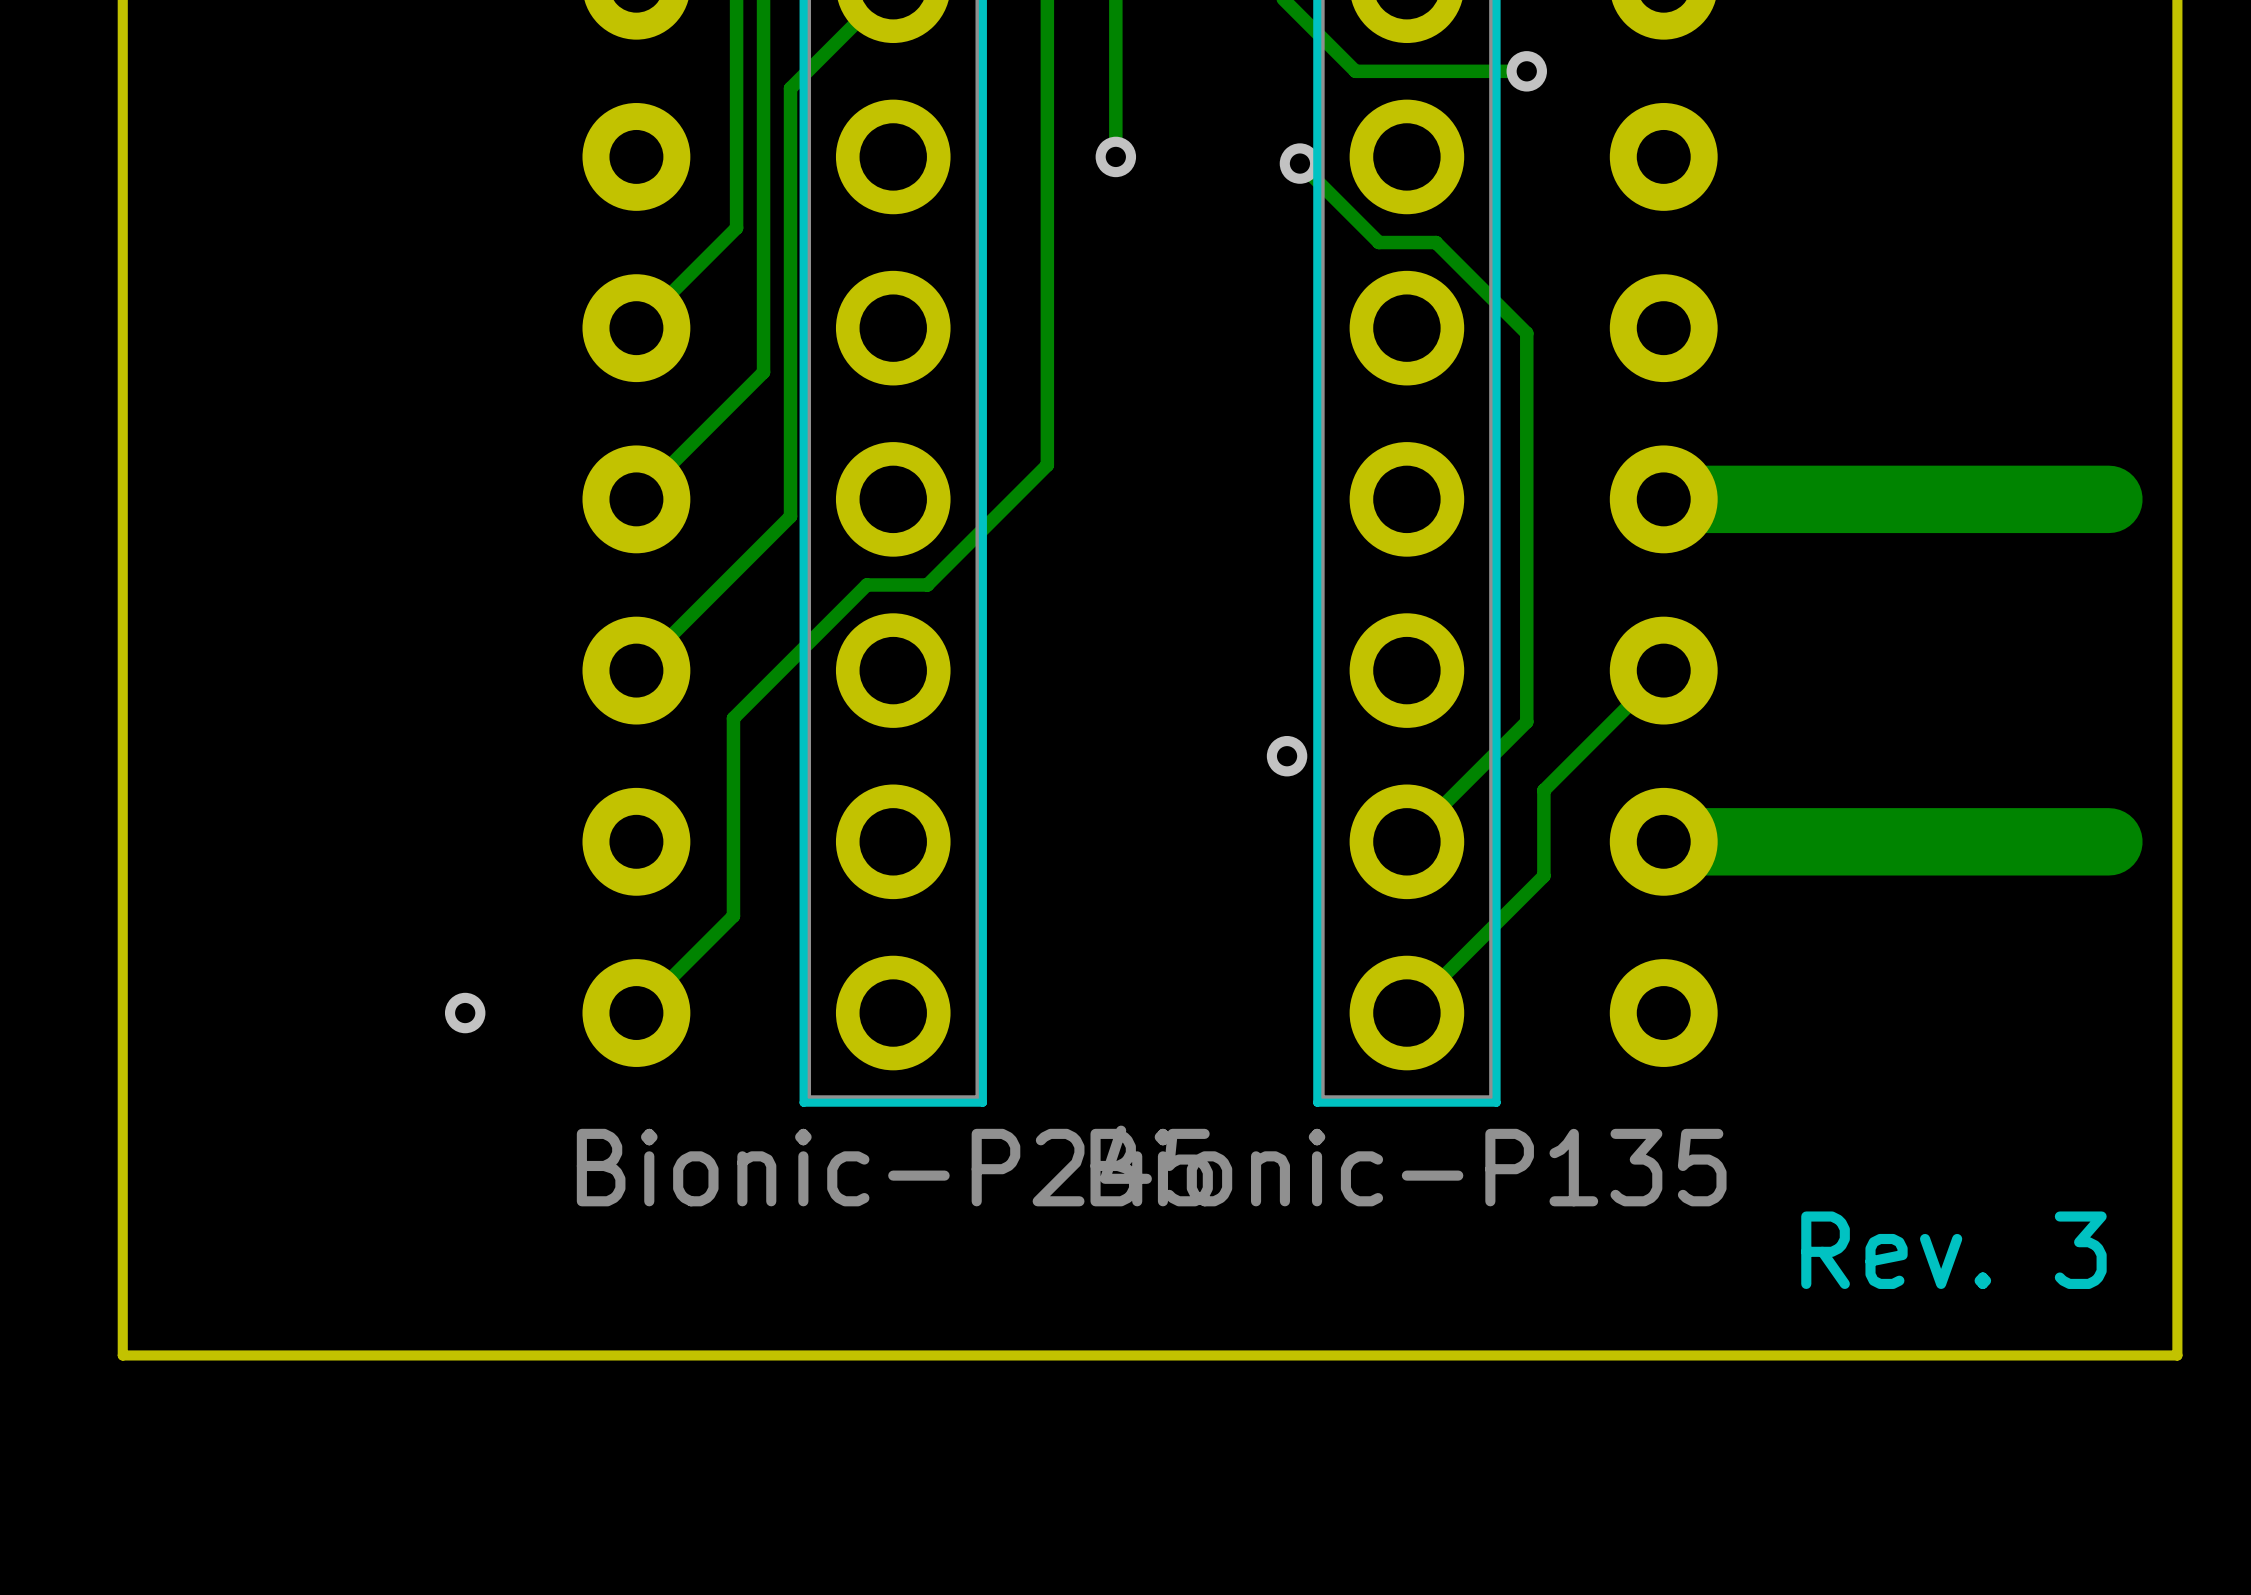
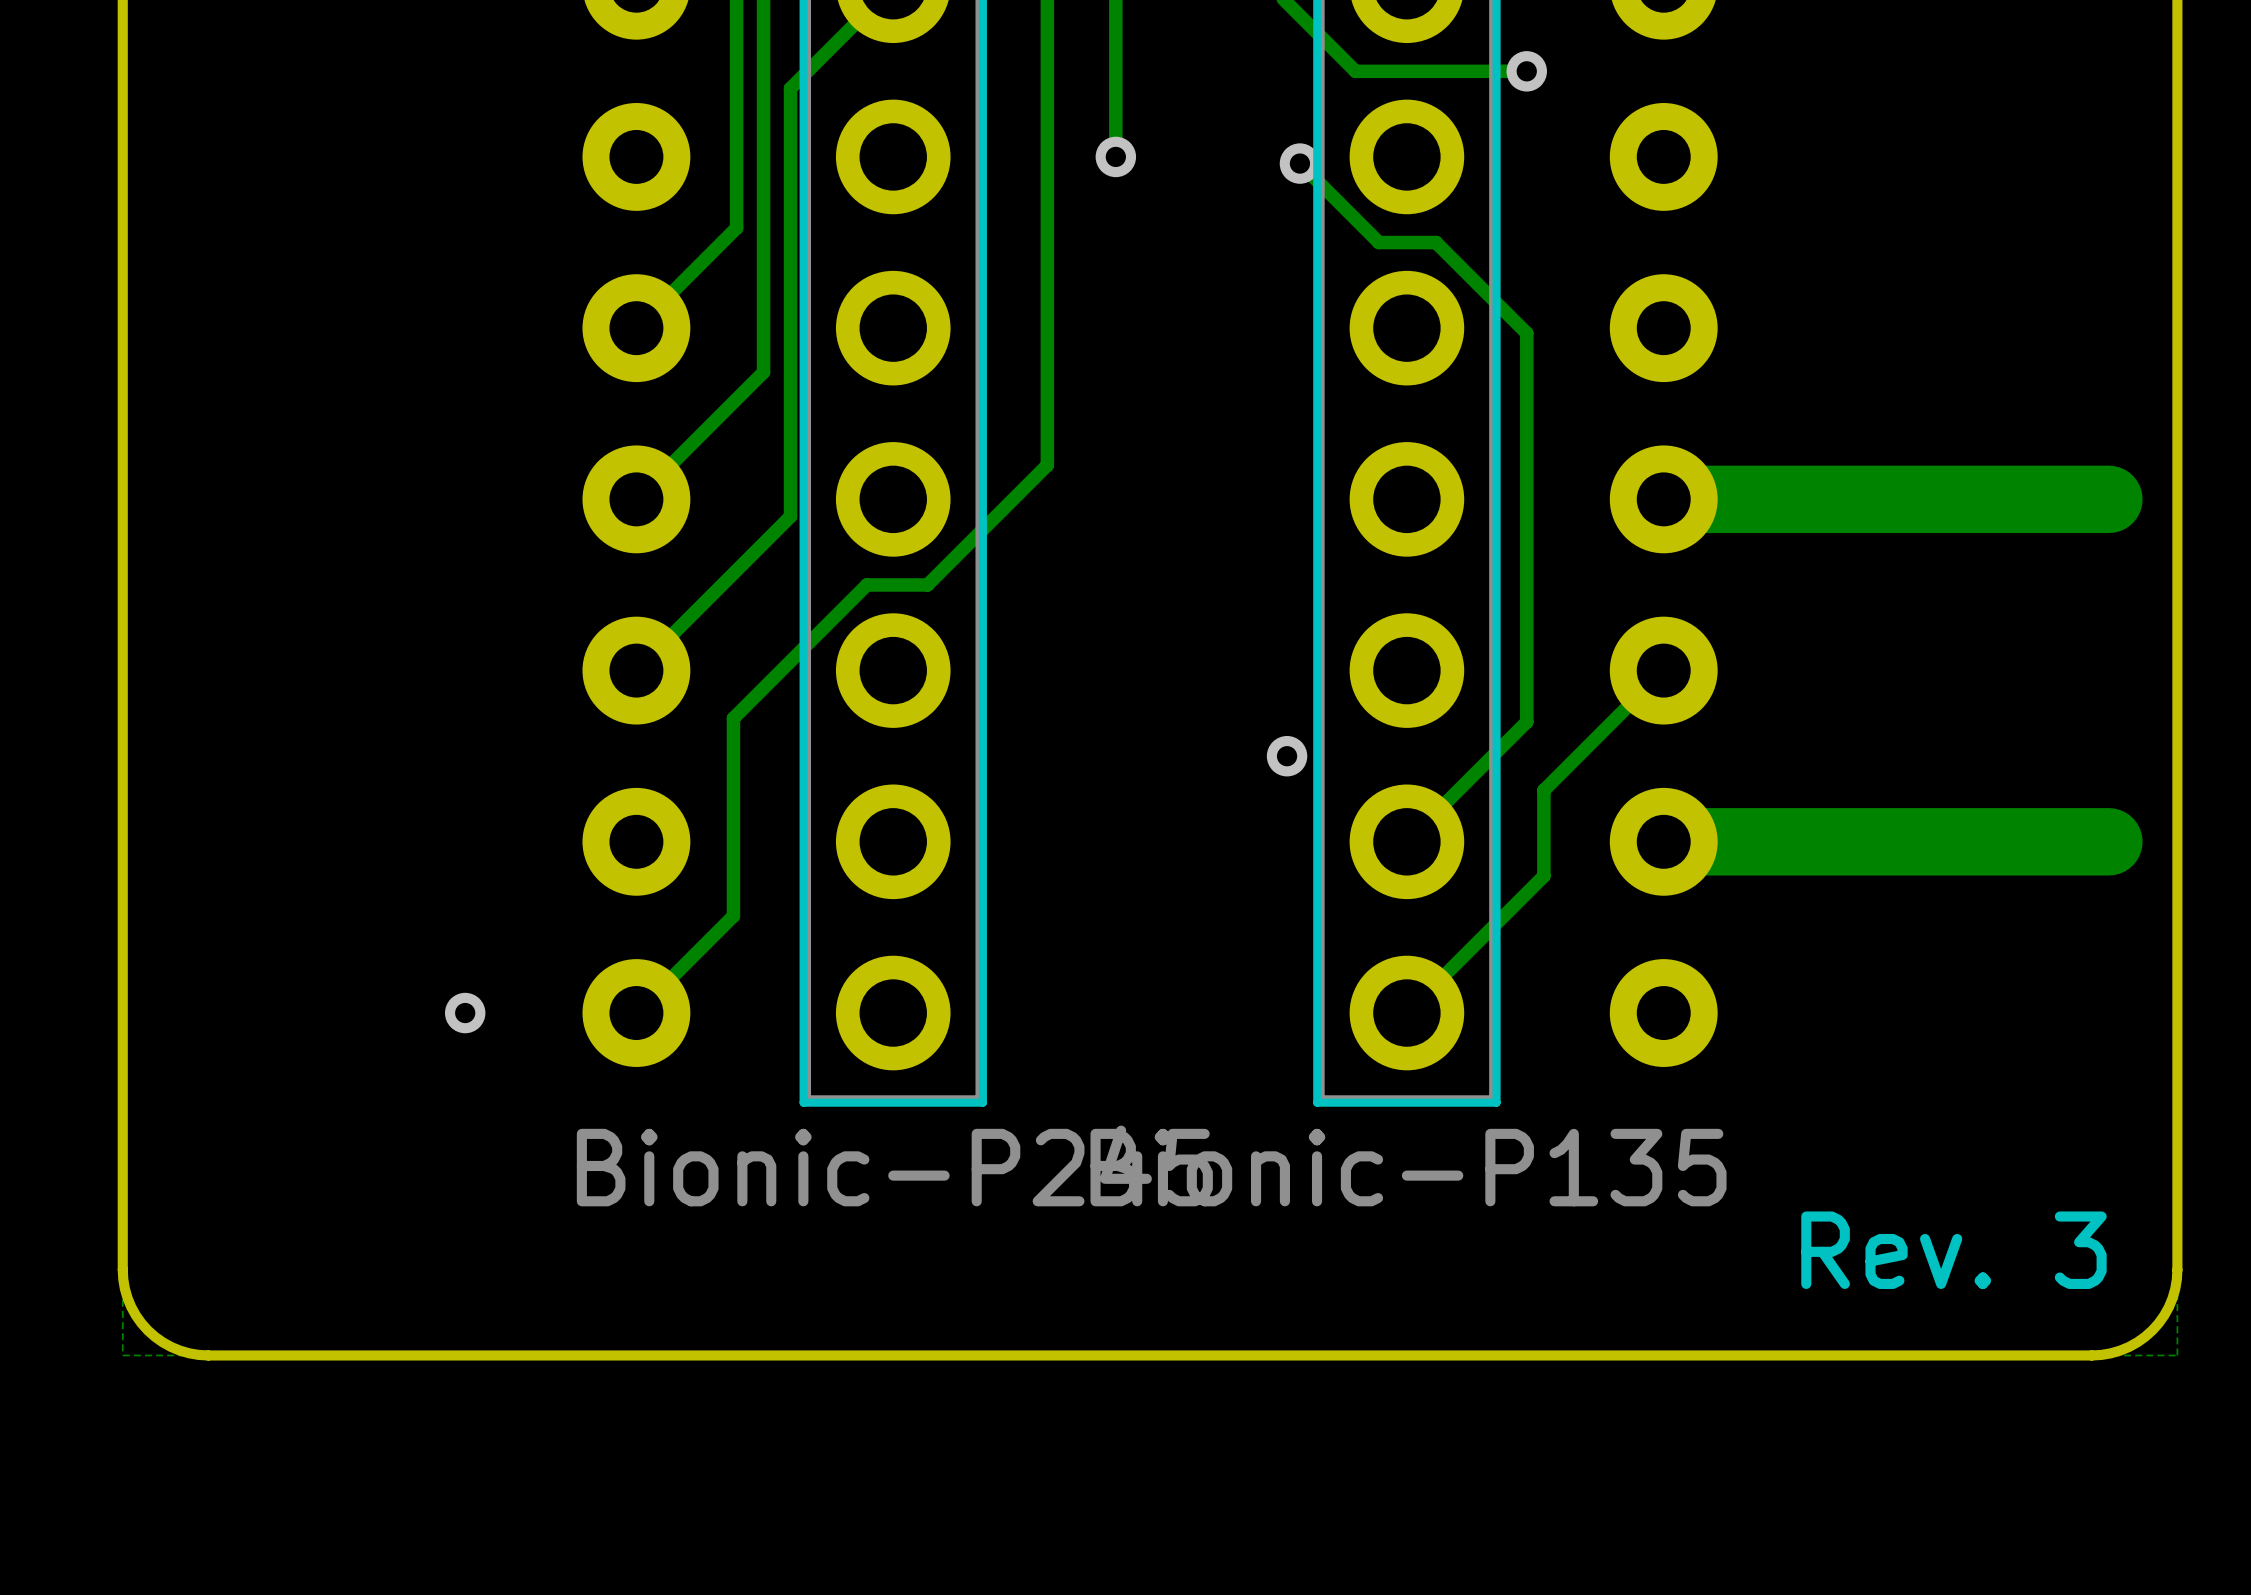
board edge: (122, 1269) (122, 1355) (208, 1355) -> (122, 1269) (124, 1288) (131, 1307) (147, 1330) (162, 1342) (180, 1350) (208, 1355)
board edge: (2177, 1269) (2177, 1355) (2091, 1355) -> (2177, 1269) (2172, 1298) (2164, 1315) (2152, 1330) (2128, 1346) (2110, 1353) (2091, 1355)

